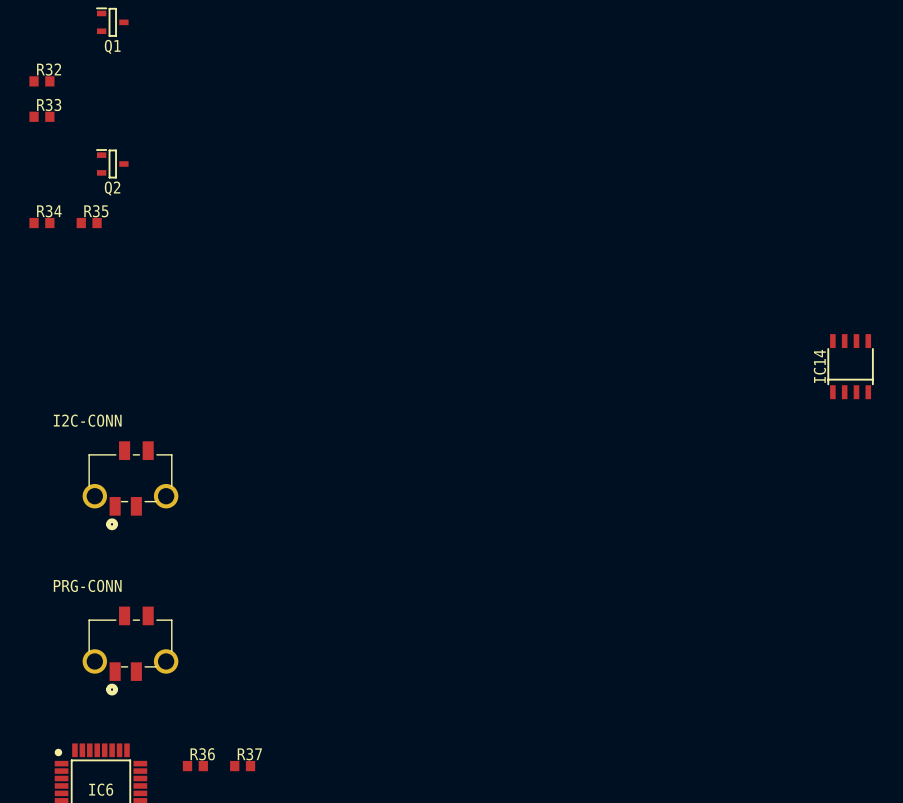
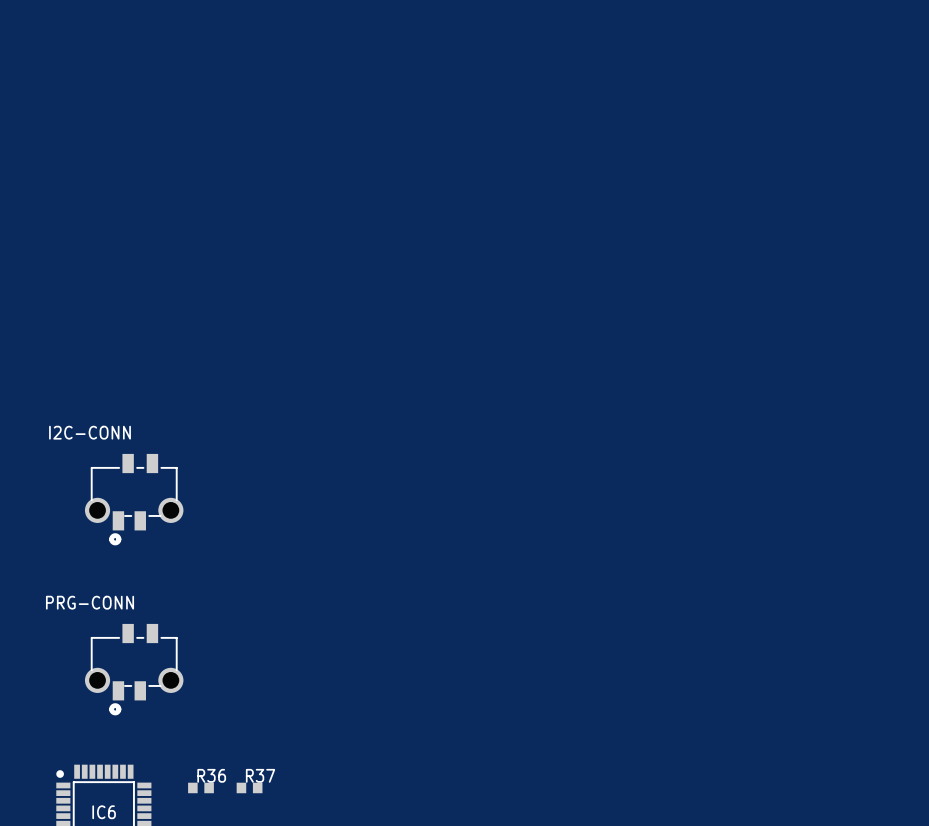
Q1: (112, 22) -> none
R32: (41, 81) -> none
R33: (41, 116) -> none
Q2: (112, 163) -> none
R34: (41, 223) -> none
R35: (89, 223) -> none
IC14: (850, 366) -> none

